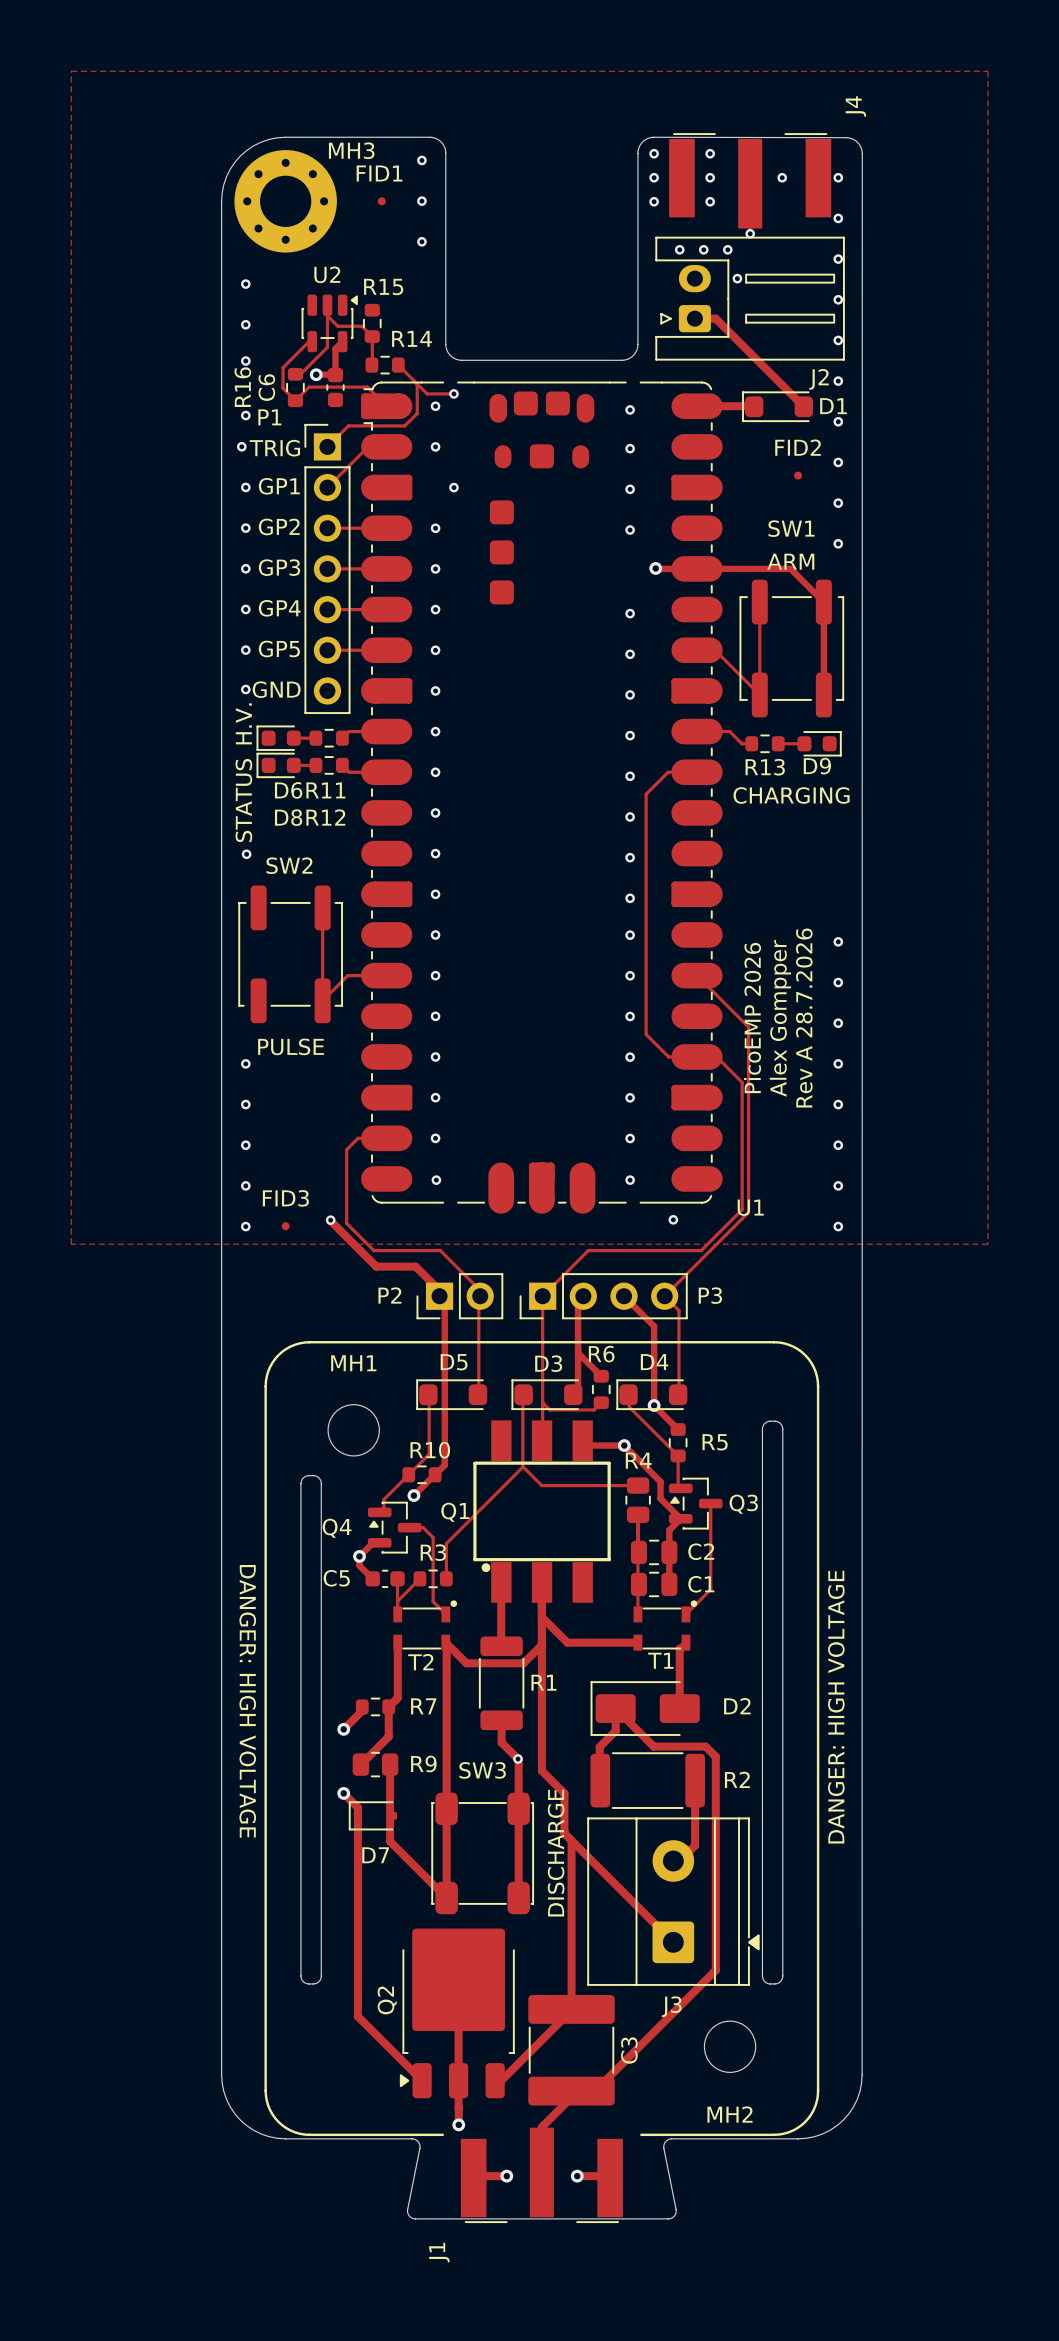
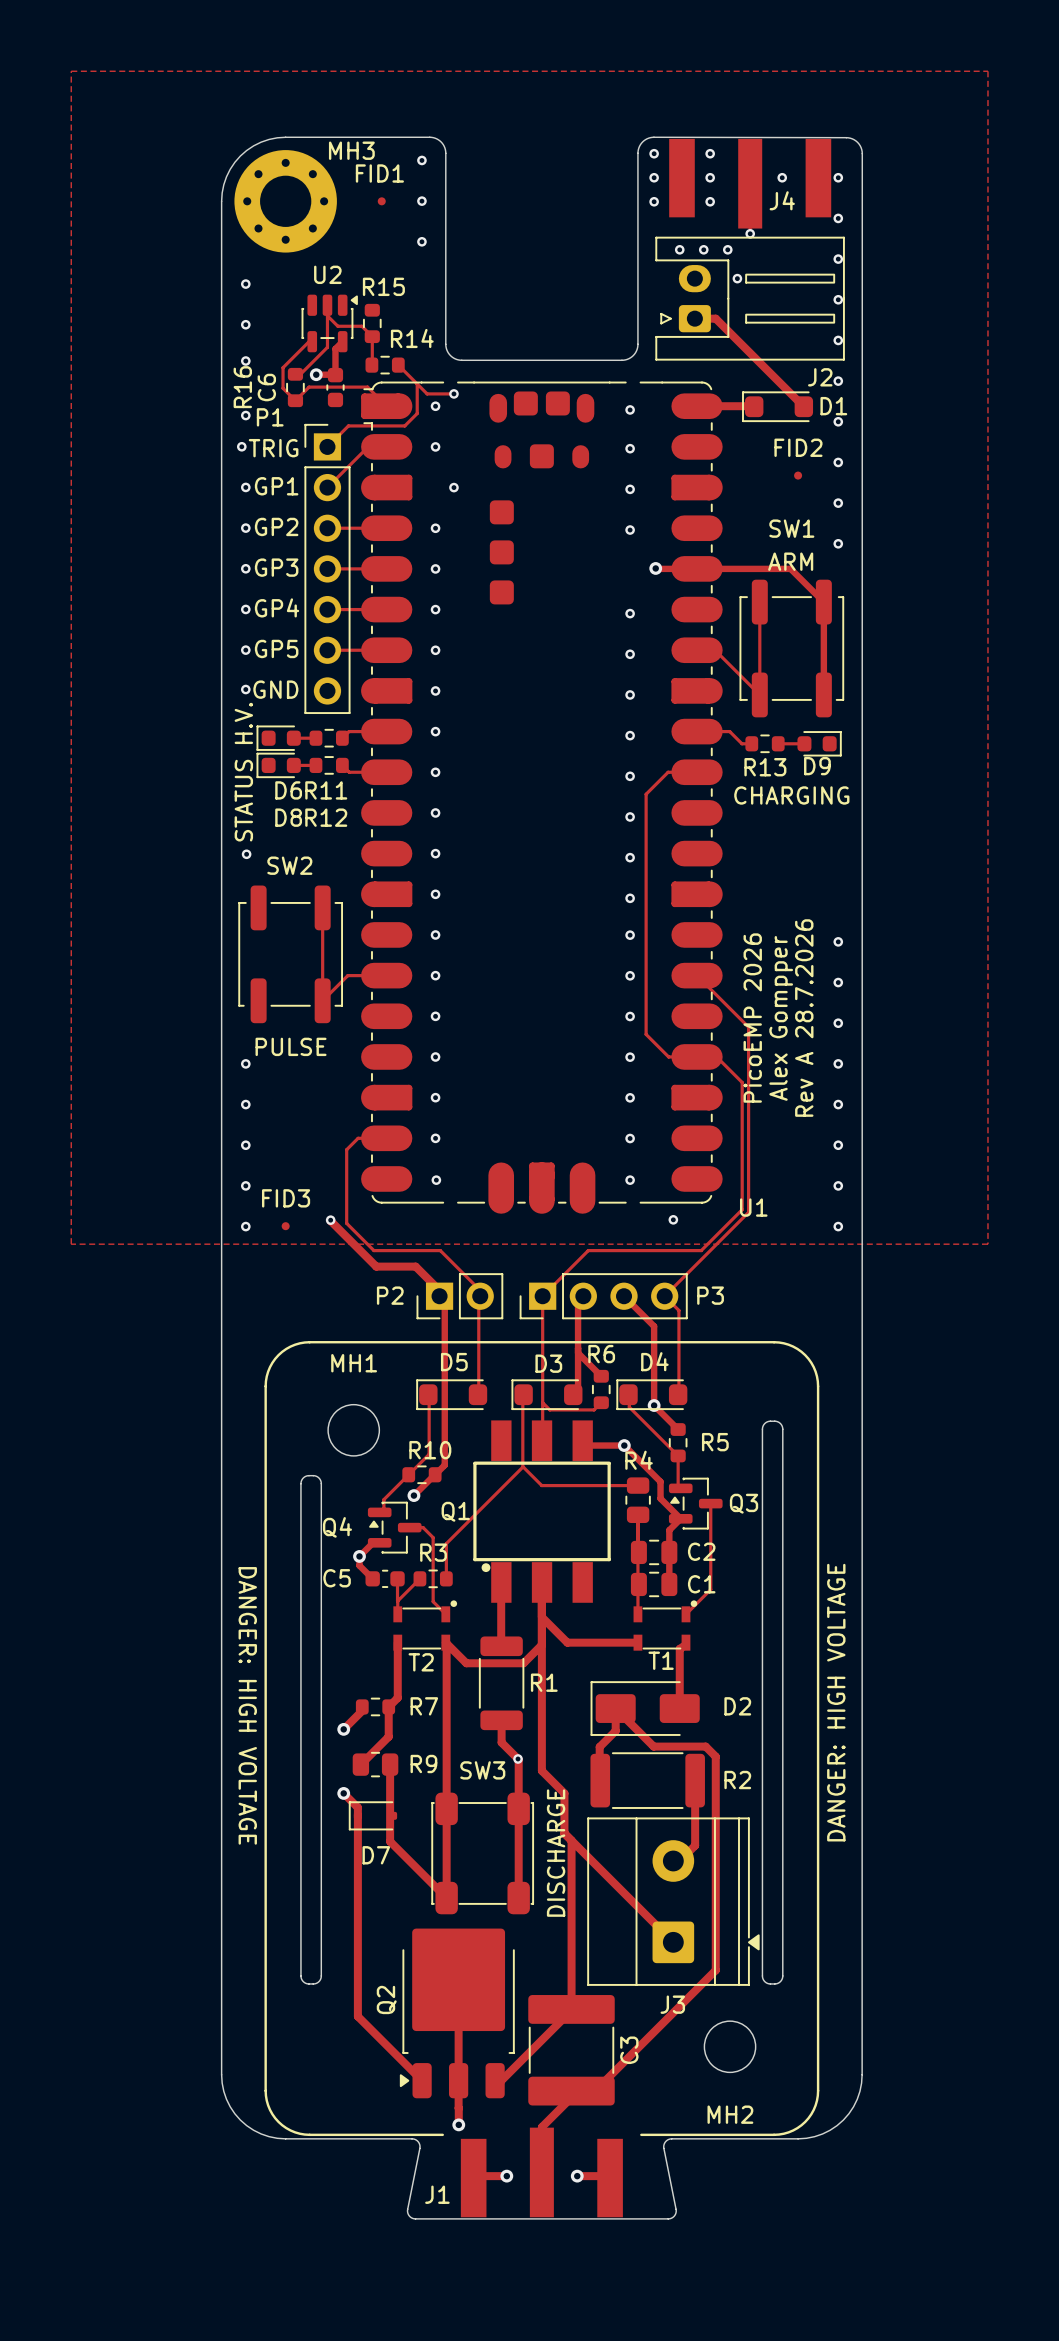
J4 name position: J4 (855, 106) -> J4 (782, 200)
J4 footprint: [669, 133, 832, 229] -> [669, 138, 832, 229]
J1 footprint: [460, 2127, 623, 2224] -> [460, 2127, 623, 2218]
J1 name position: J1 (439, 2252) -> J1 (437, 2194)

